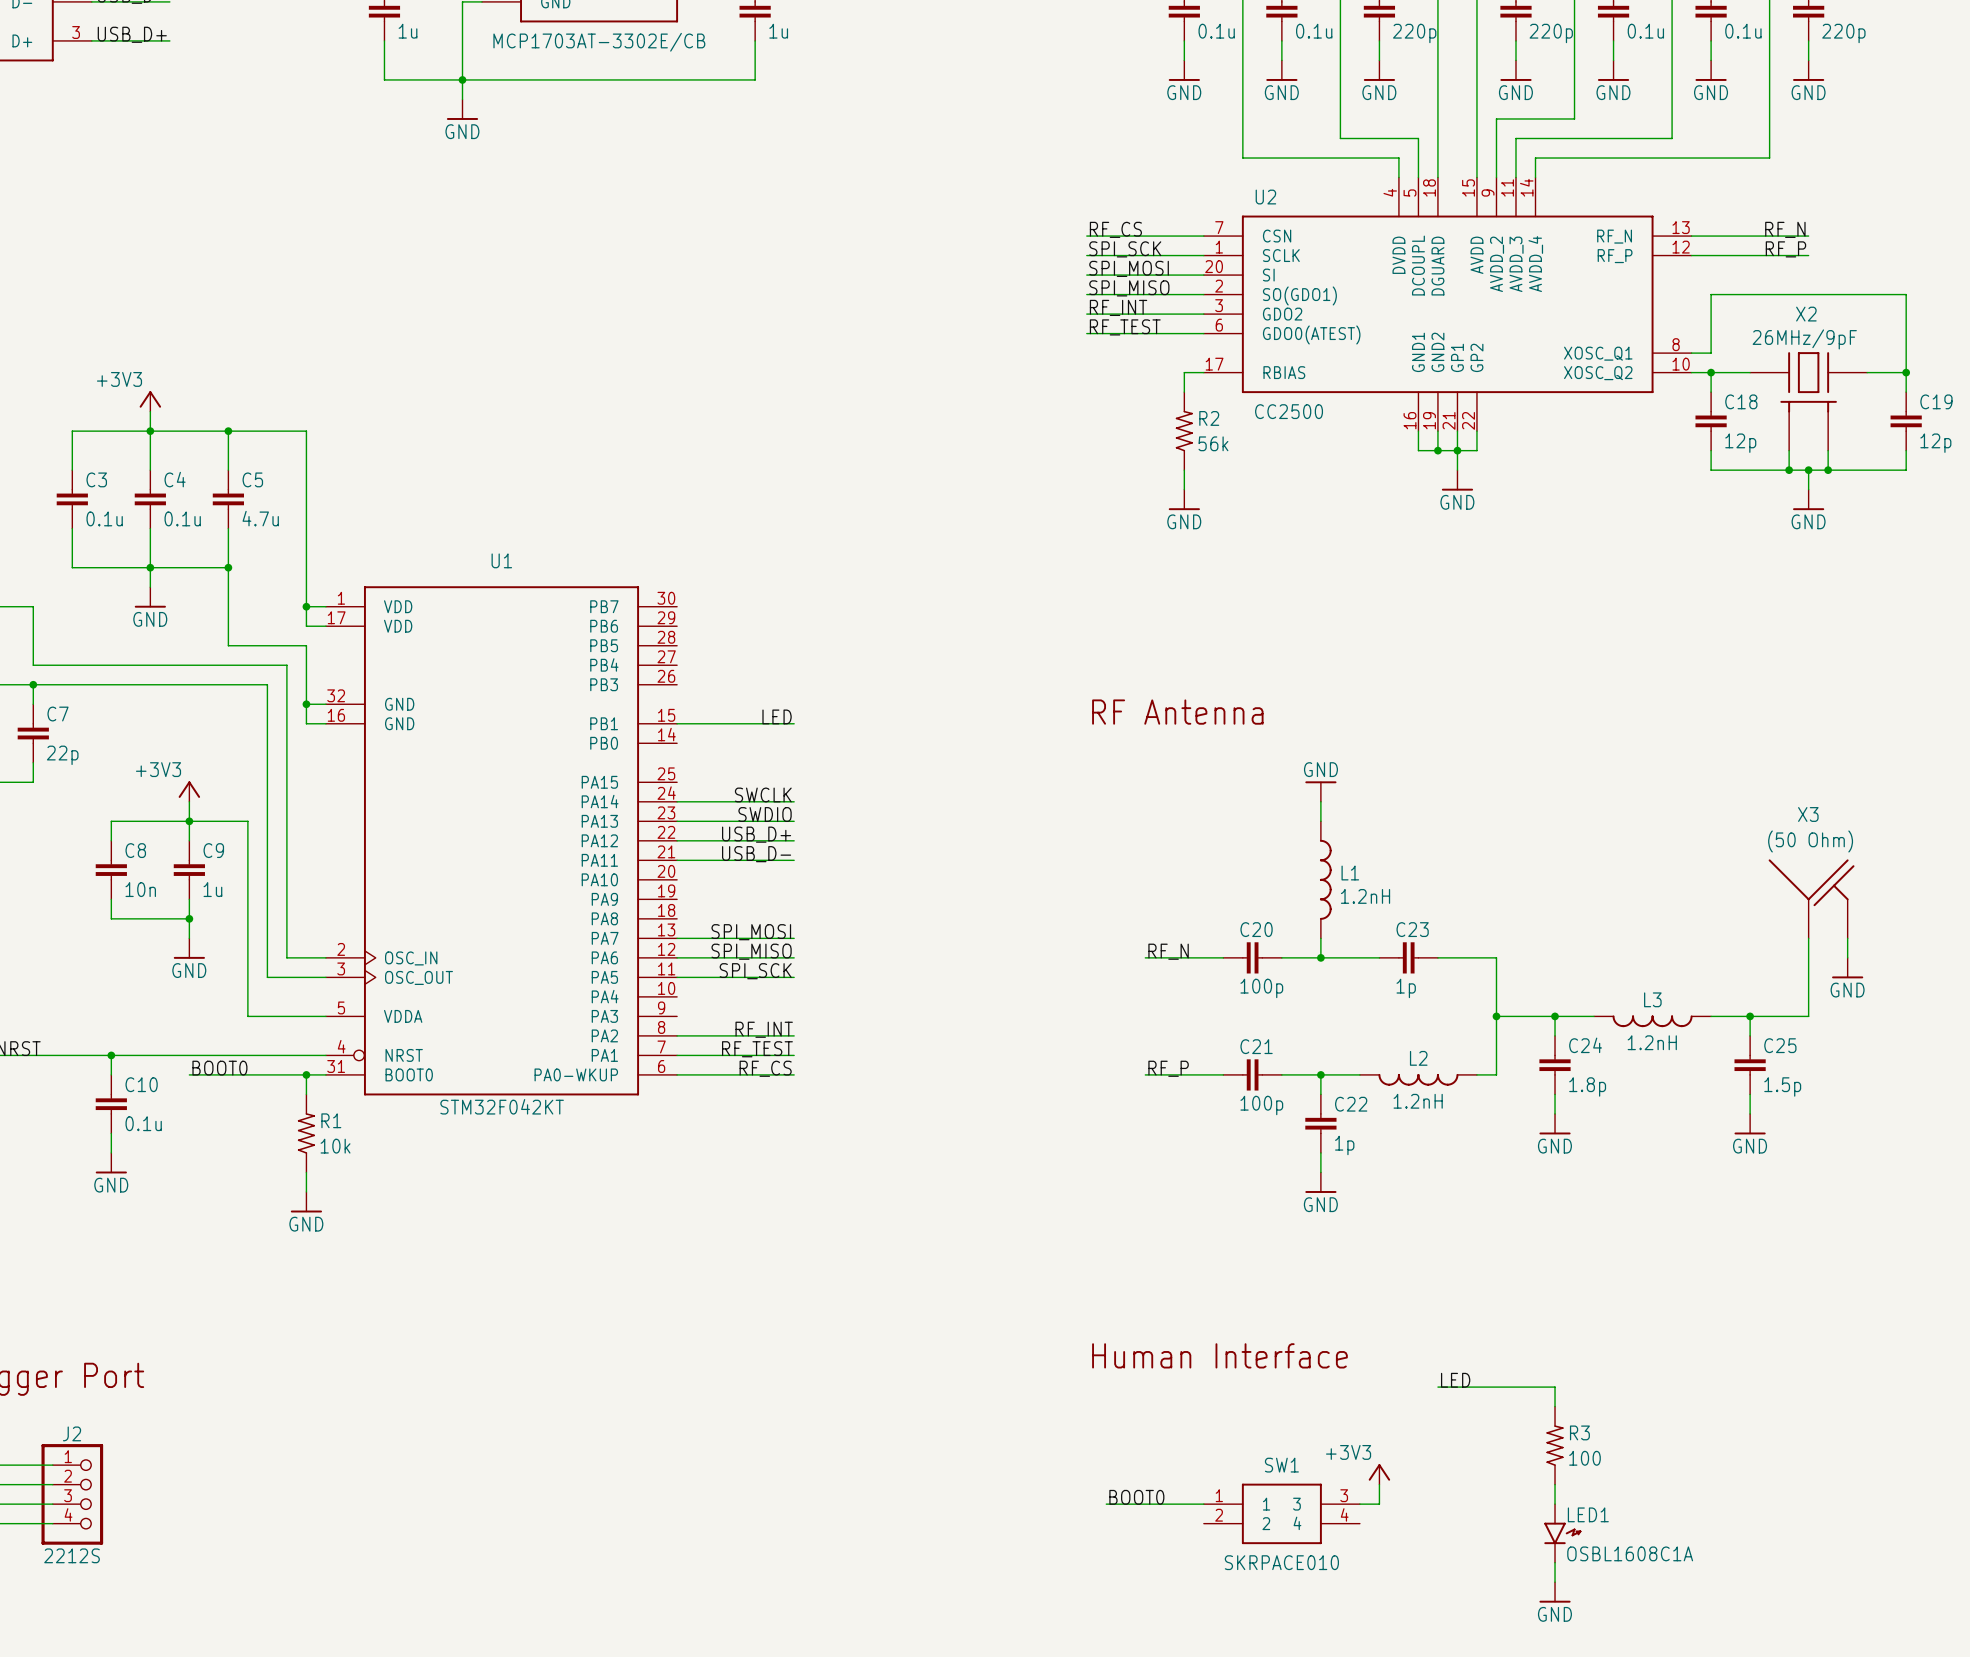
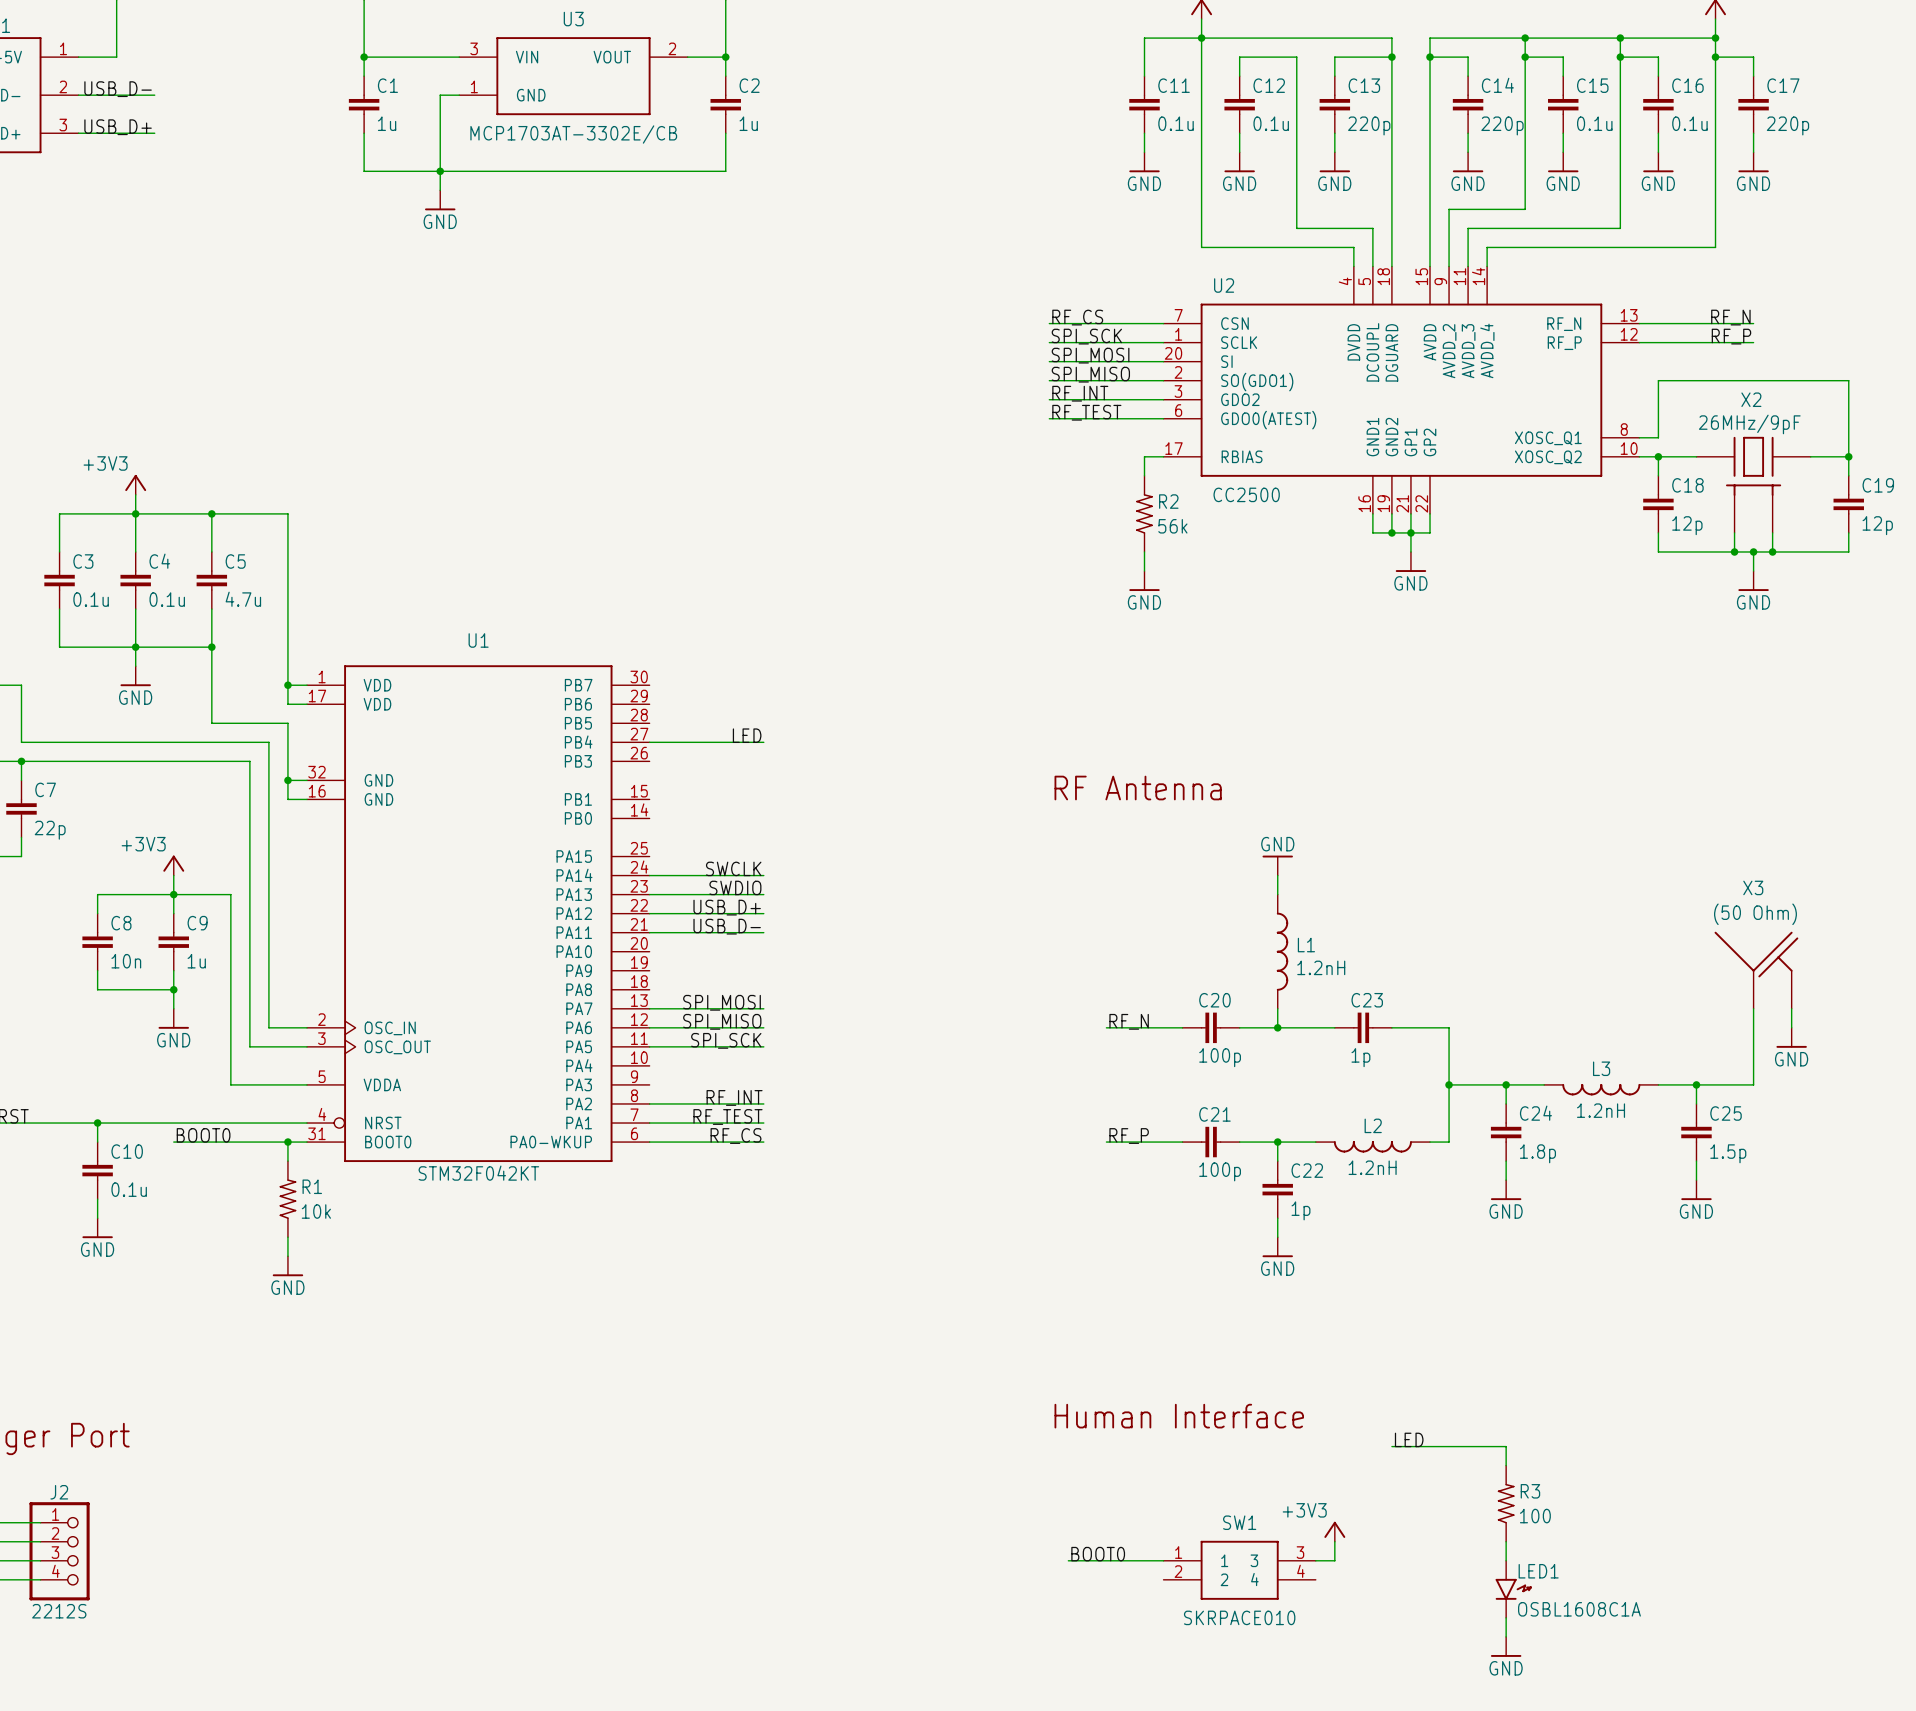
label position: LED (777, 716) -> LED (747, 735)
wire: (677, 723) (794, 723) -> (649, 742) (763, 742)

